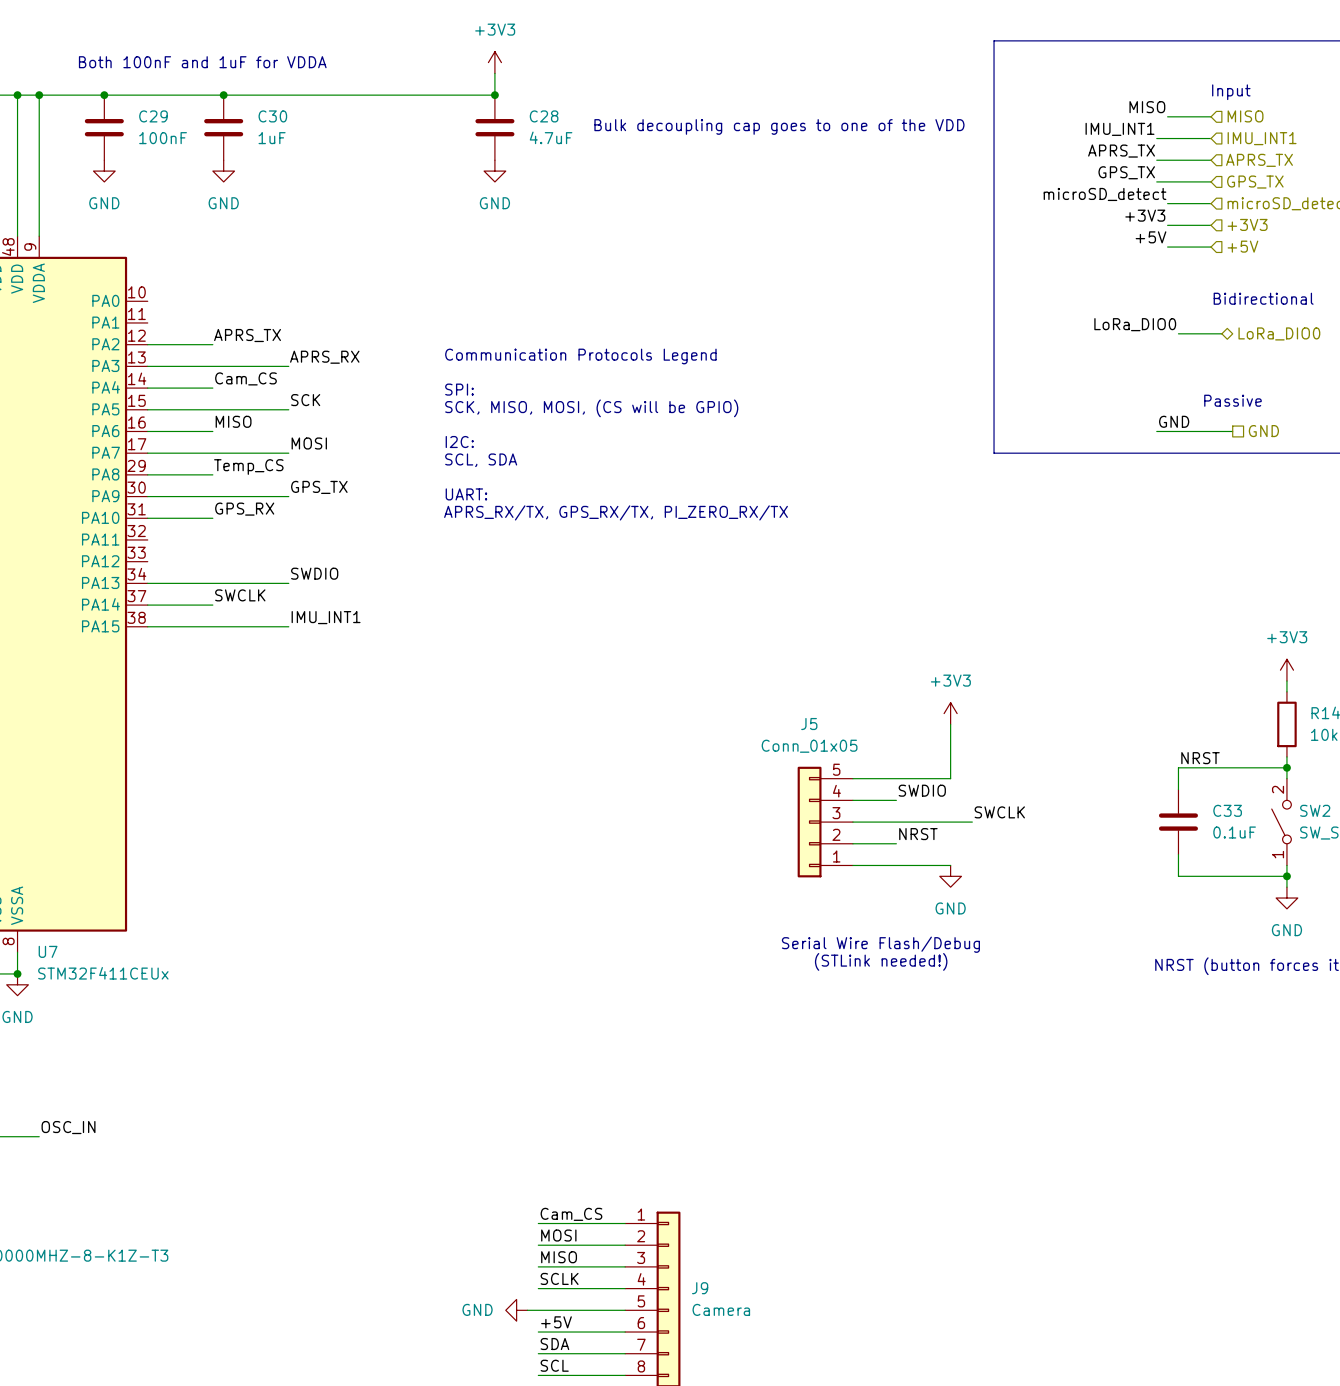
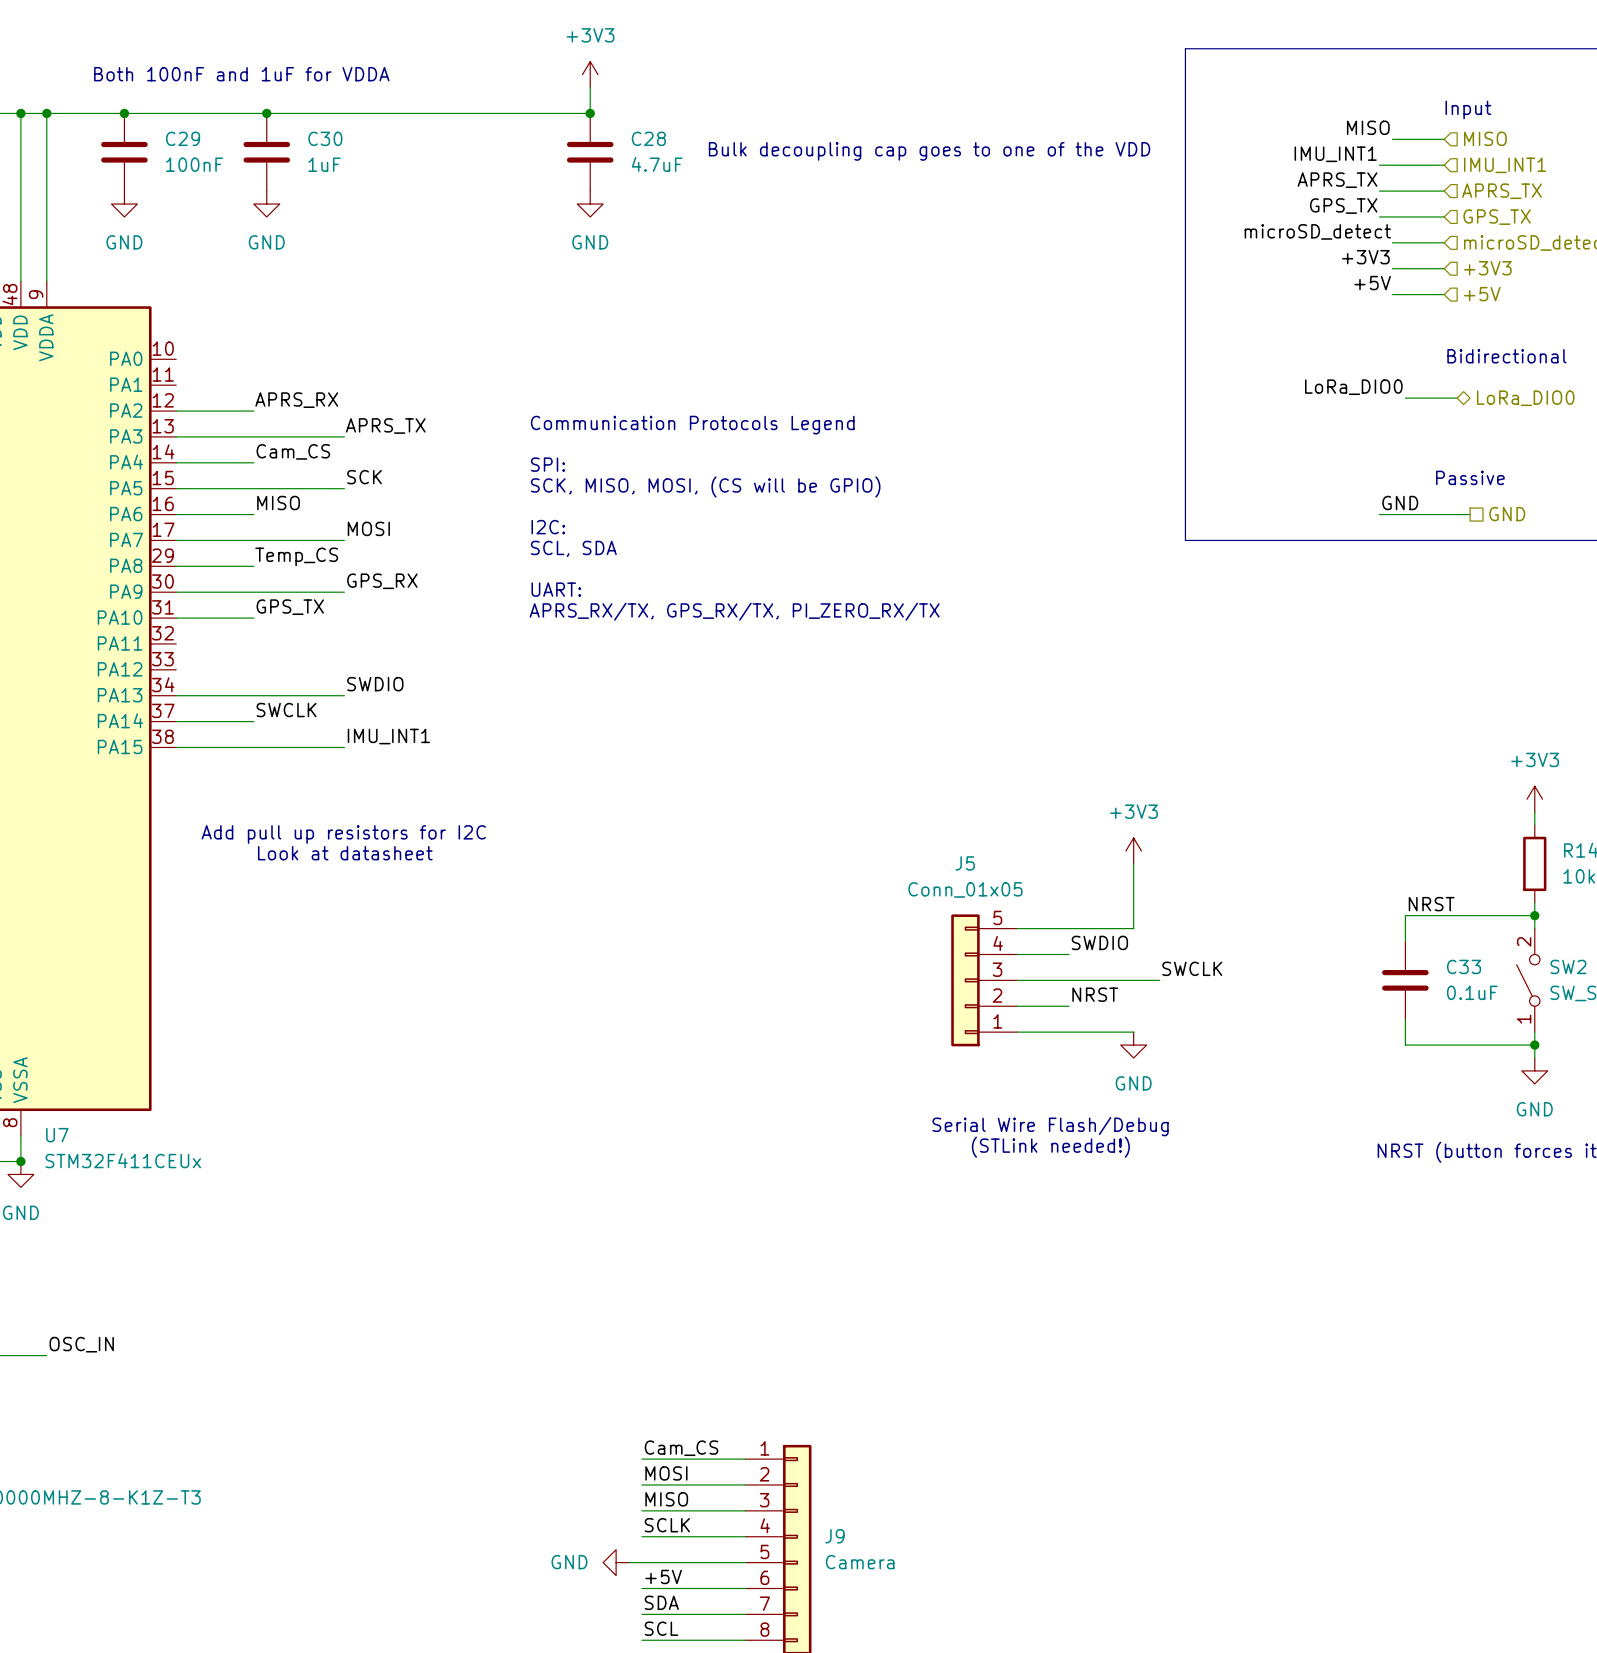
label: APRS_TX (247, 335) -> APRS_RX (296, 400)
label: APRS_RX (324, 357) -> APRS_TX (385, 426)
label: GPS_TX (319, 487) -> GPS_RX (382, 581)
label: GPS_RX (244, 509) -> GPS_TX (290, 607)
text: none -> Add pull up resistors for I2C (343, 834)
text: none -> Look at datasheet (345, 853)

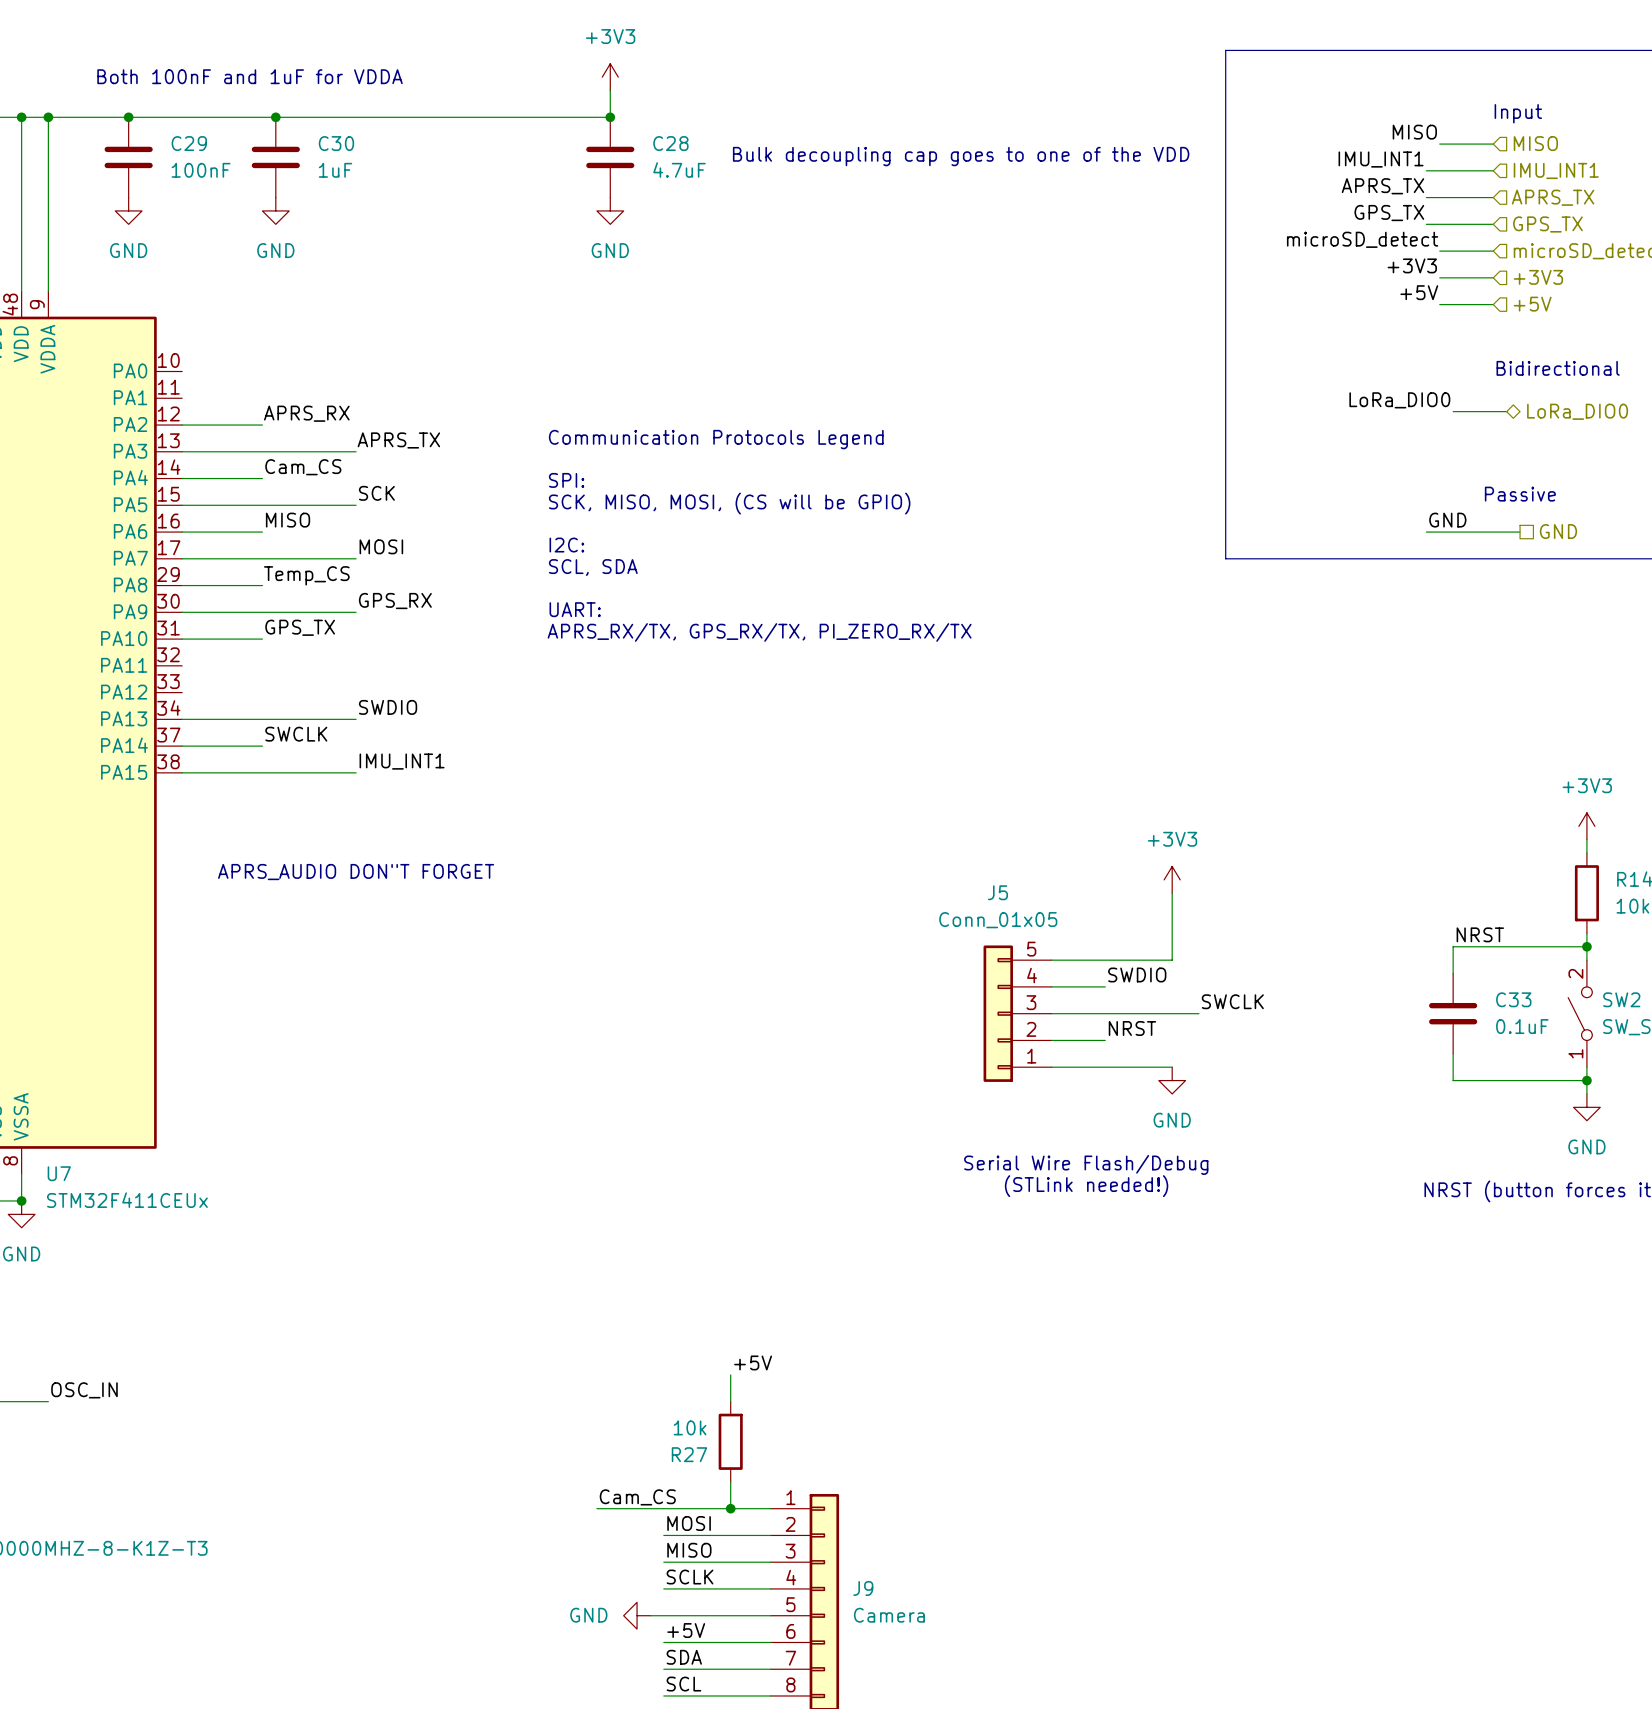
text: Add pull up resistors for I2C (343, 834) -> none
text: none -> APRS_AUDIO DON"T FORGET (356, 872)
text: Look at datasheet (345, 853) -> none
label: none -> +5V (753, 1362)
wire: none -> (730, 1374) (730, 1401)
R27: none -> 10k (730, 1441)
wire: none -> (730, 1481) (730, 1508)
label position: Cam_CS (681, 1448) -> Cam_CS (637, 1497)
wire: none -> (596, 1508) (663, 1508)
junction: none -> (730, 1508)

